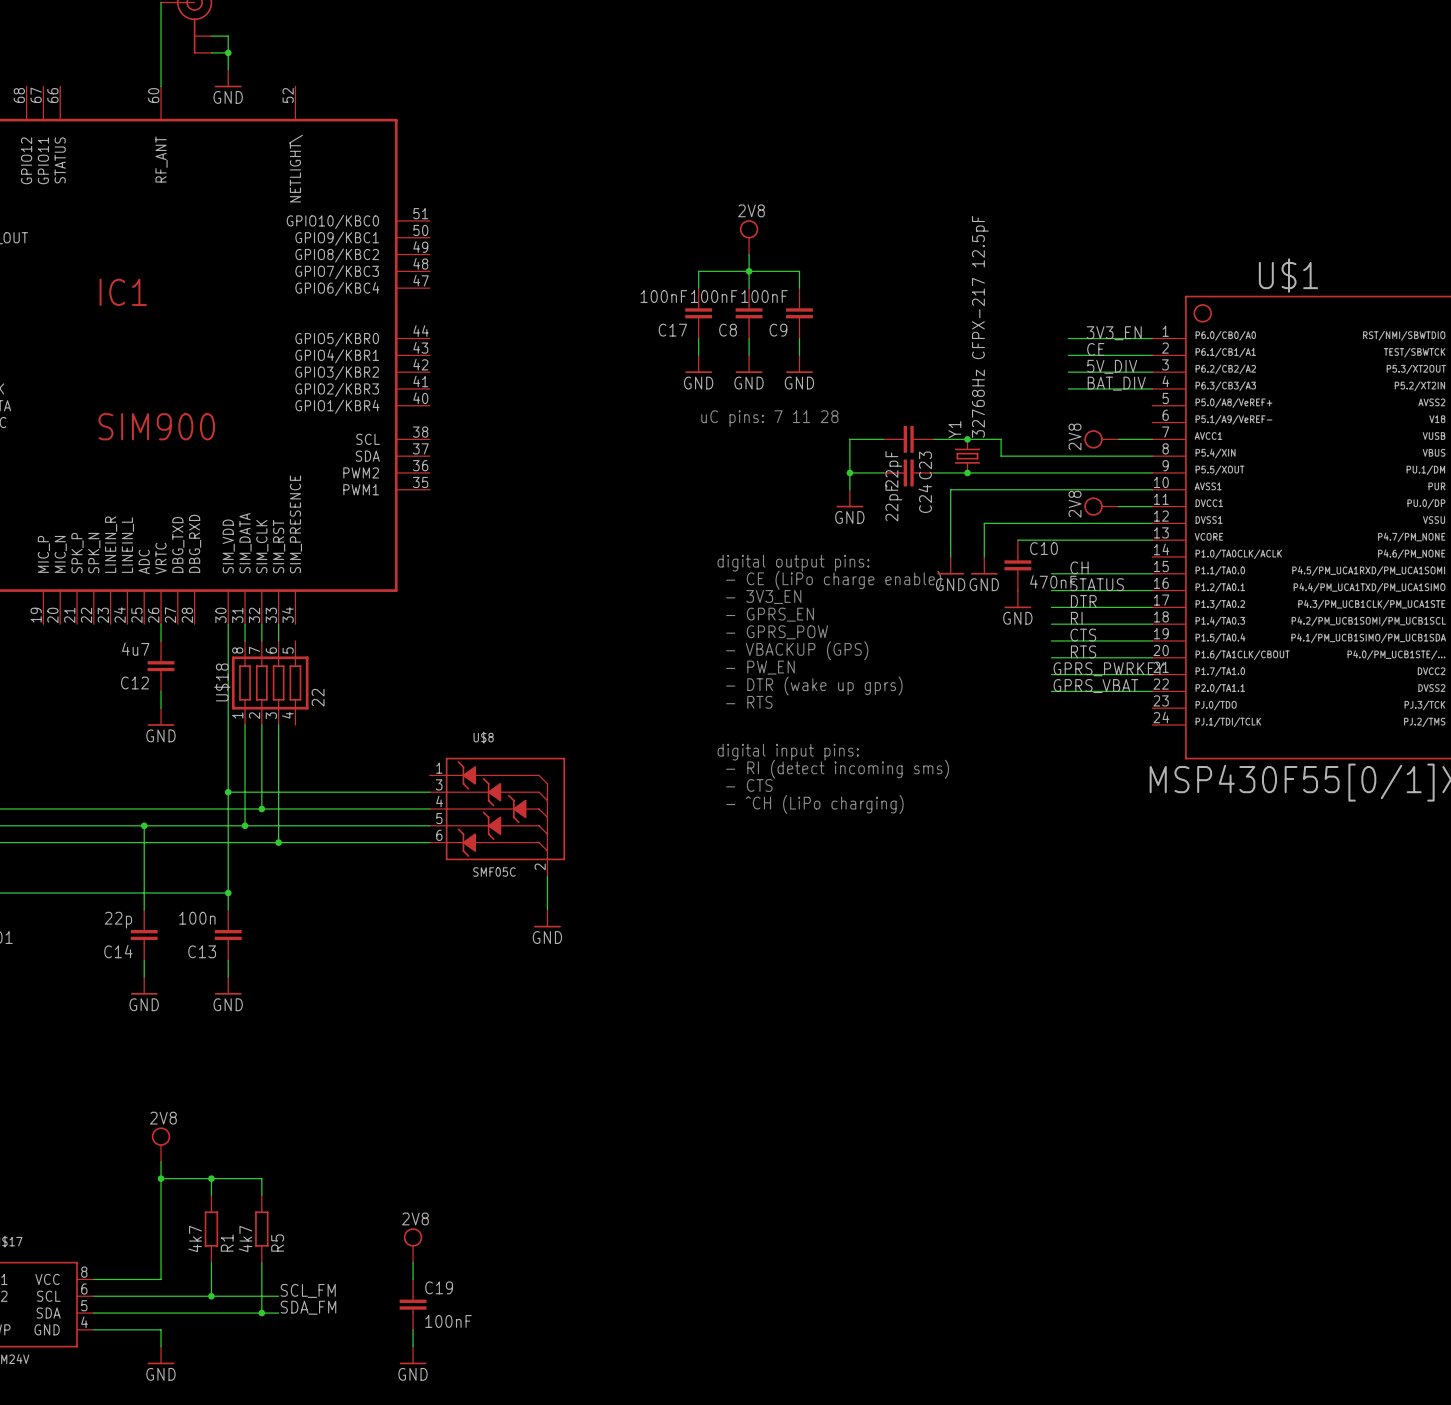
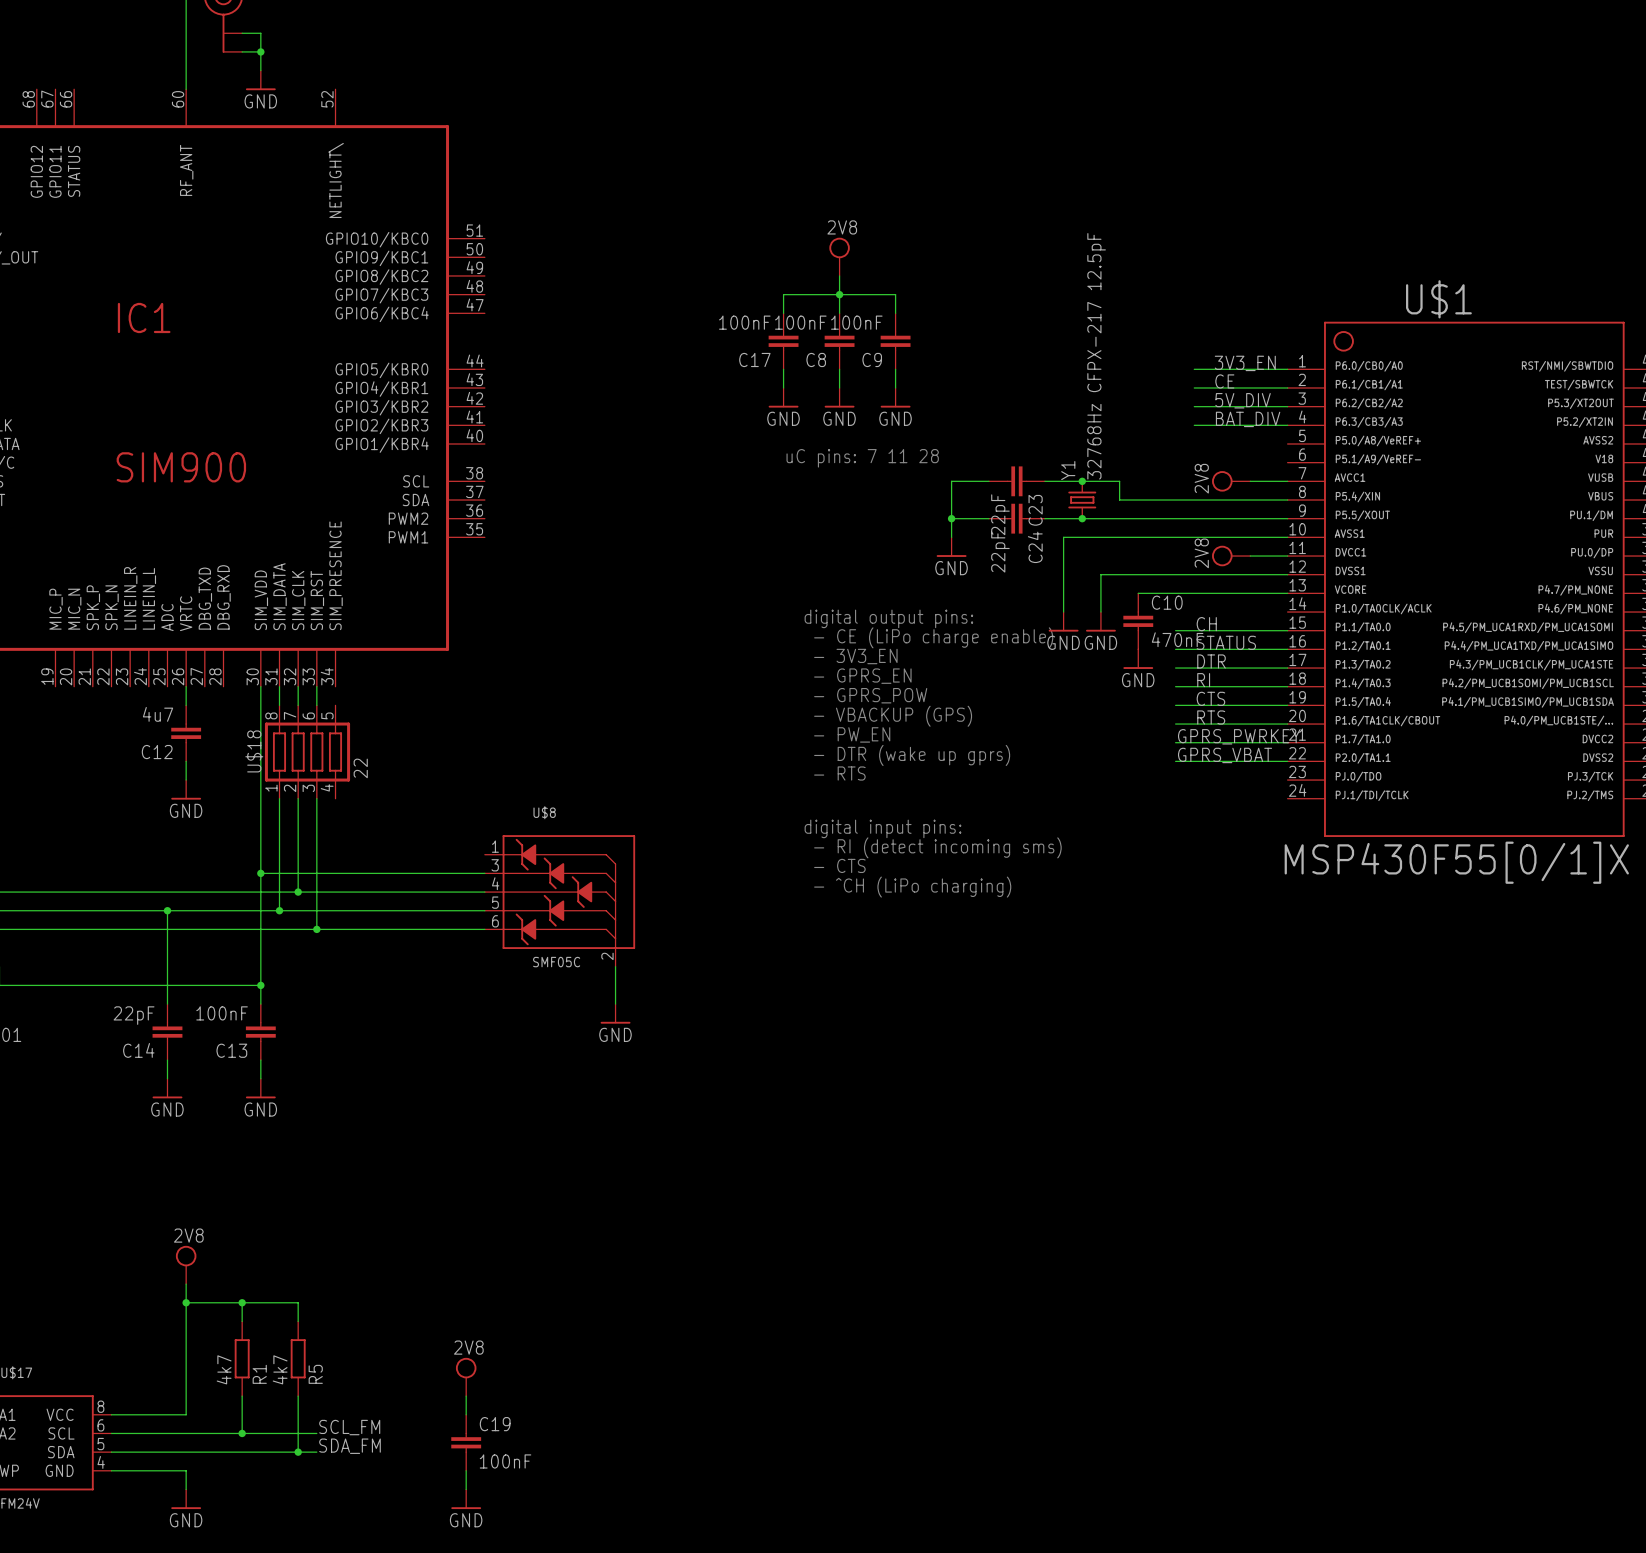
C13 value: 100n (197, 918) -> 100nF (222, 1013)
C14 value: 22p (118, 920) -> 22pF (134, 1015)

